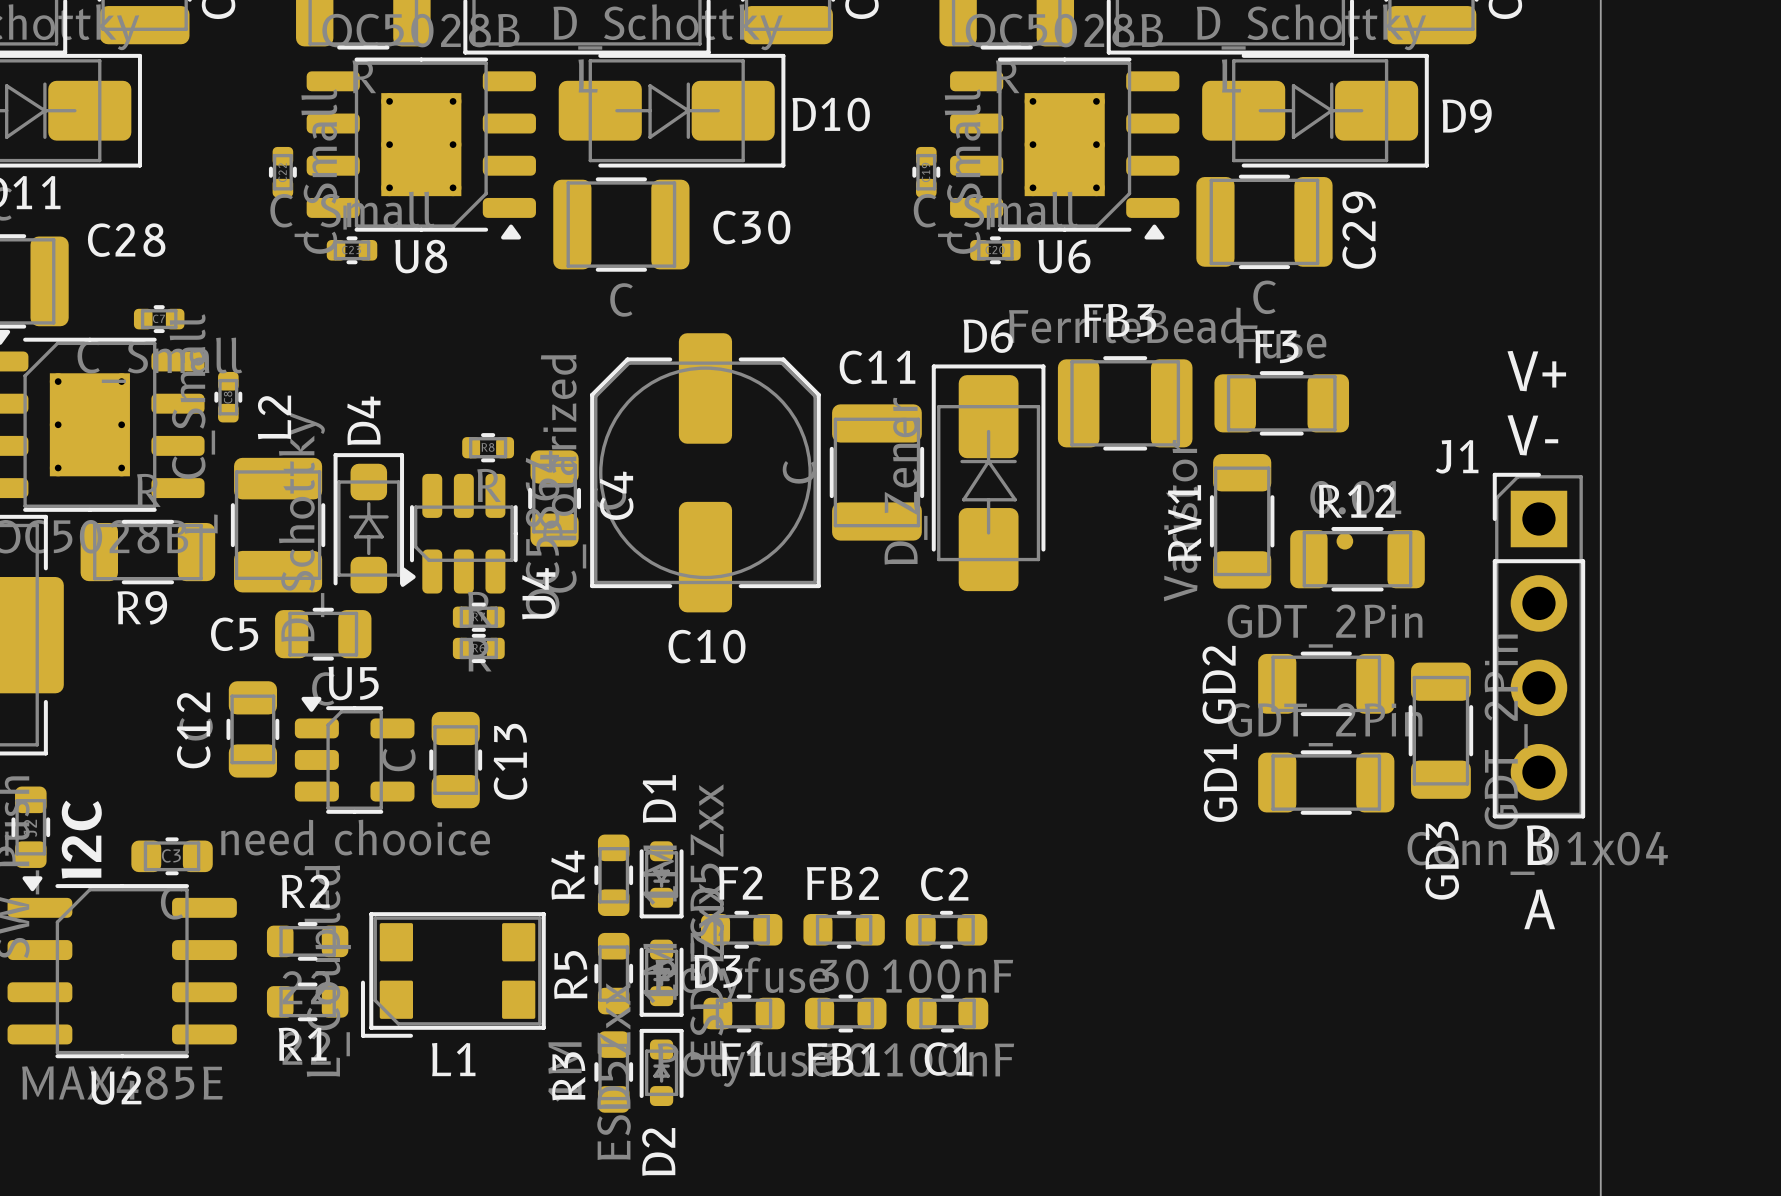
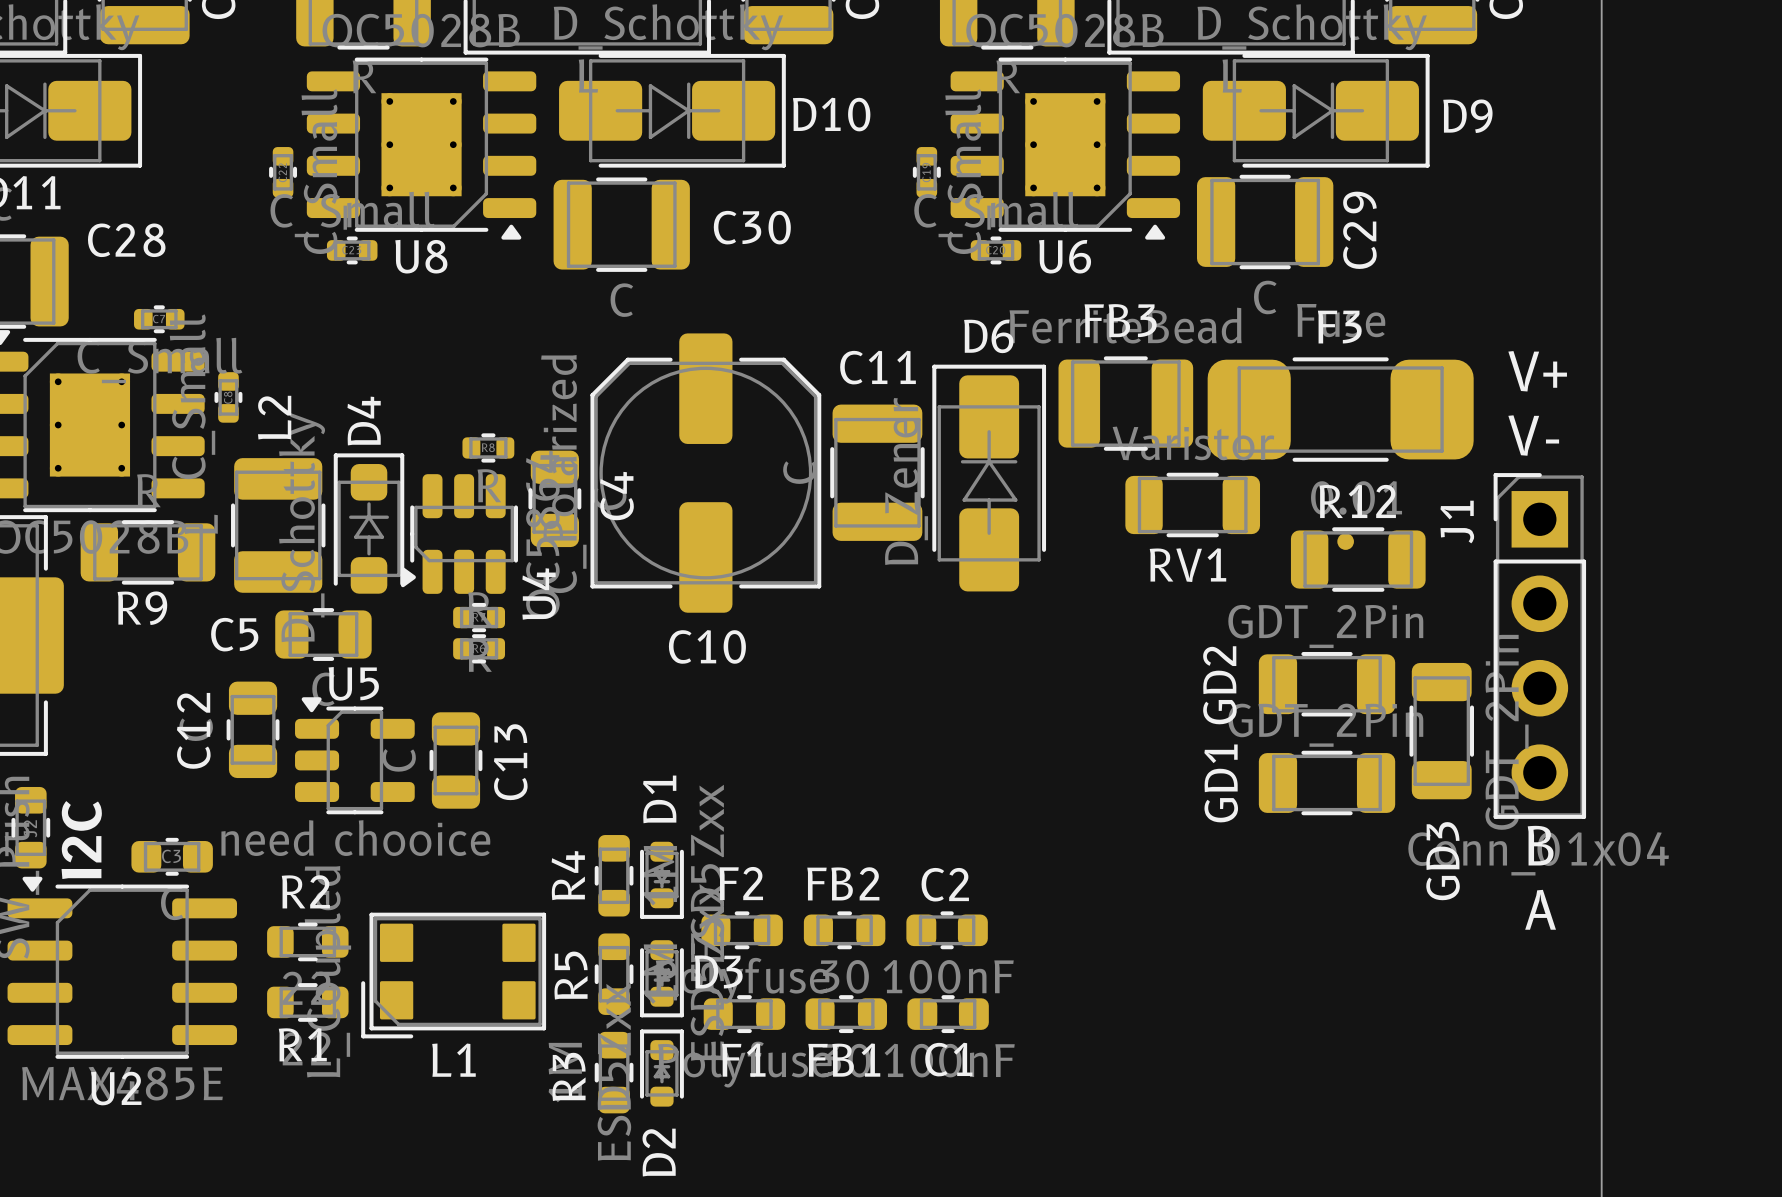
F3 footprint: [1214, 371, 1350, 436] -> [1207, 357, 1474, 462]
J1 name rotation: 0° (1457, 456) -> 90° counterclockwise (1457, 522)
RV1 rotation: 0° (1242, 521) -> 90° clockwise (1192, 504)
RV1 name position: RV1 (1184, 523) -> RV1 (1187, 565)

